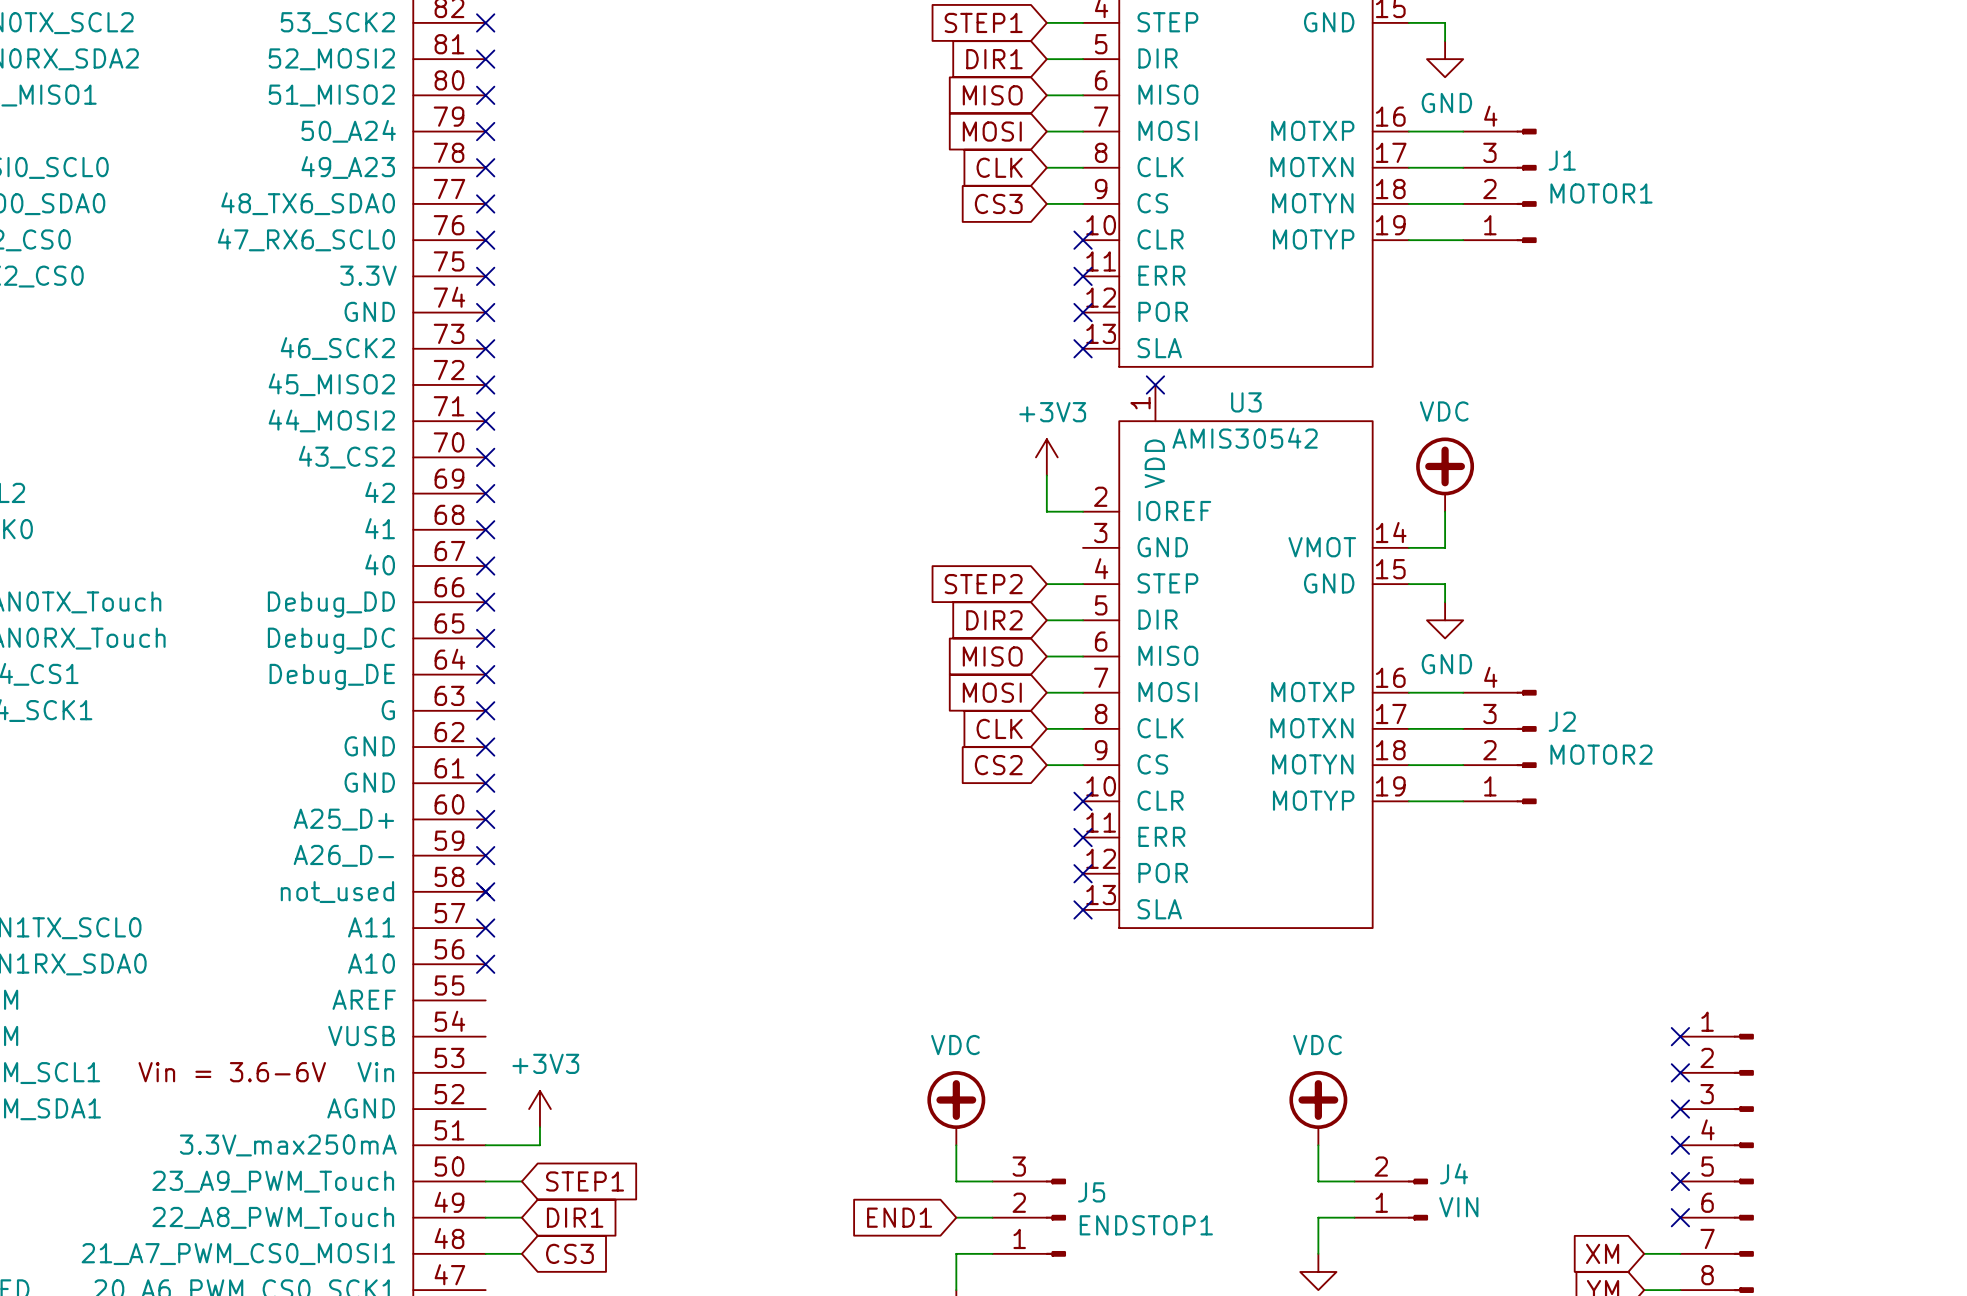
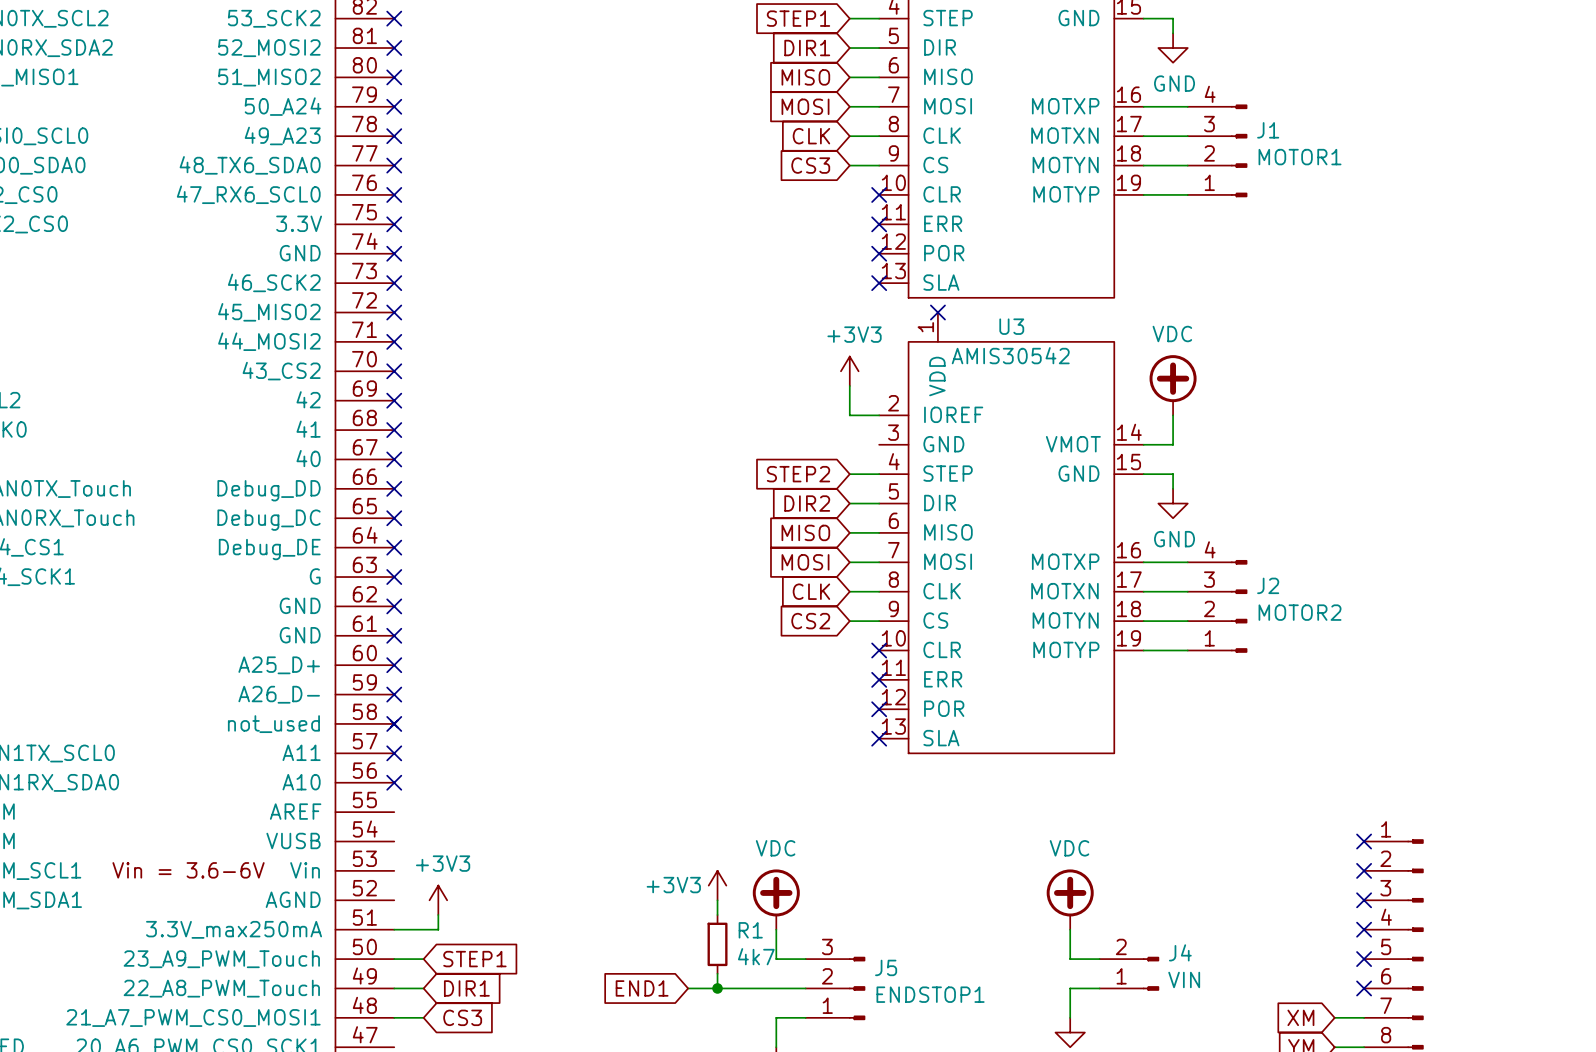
power symbol: none -> +3V3 (717, 885)
wire: none -> (717, 900) (717, 914)
R1: none -> 4k7 (717, 944)
wire: none -> (688, 988) (776, 988)
junction: none -> (717, 988)
global label position: END1 (899, 1217) -> END1 (642, 988)

